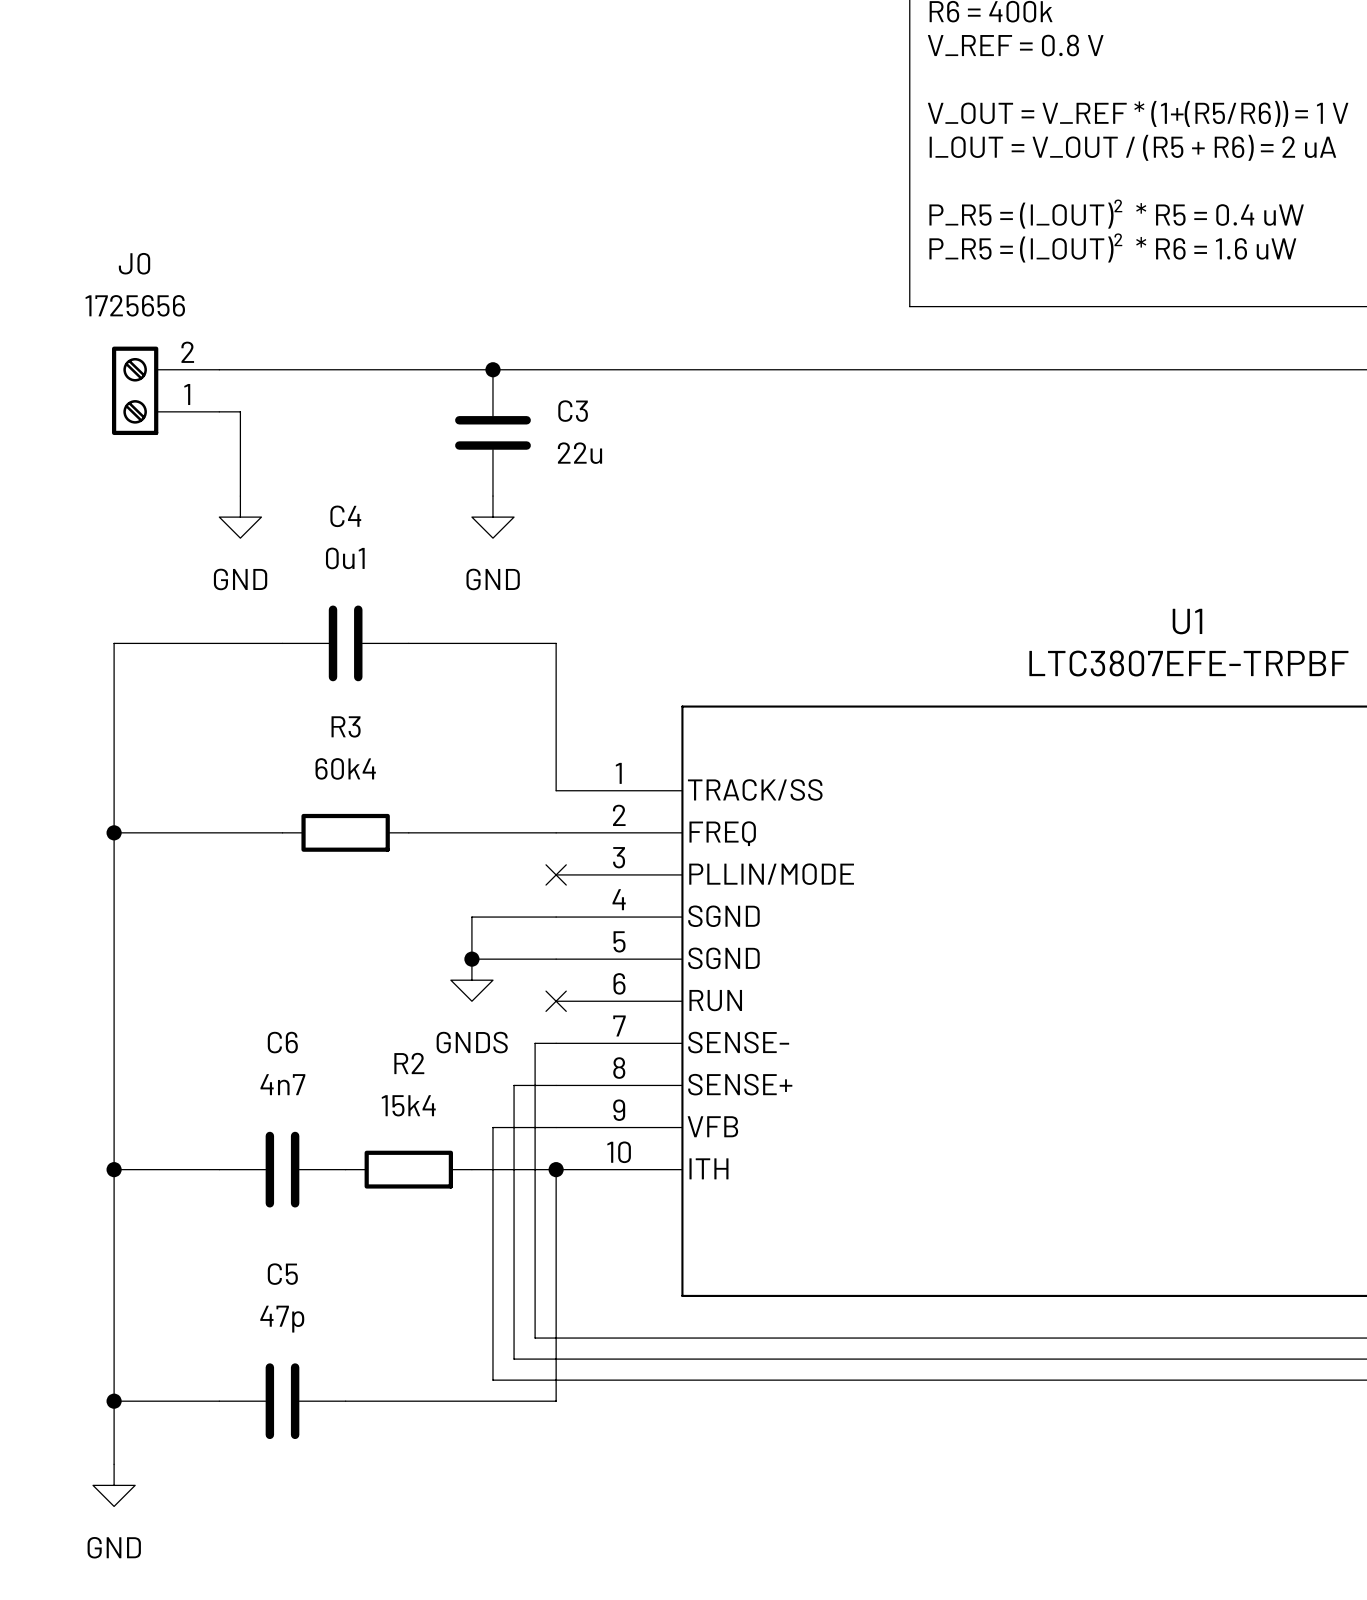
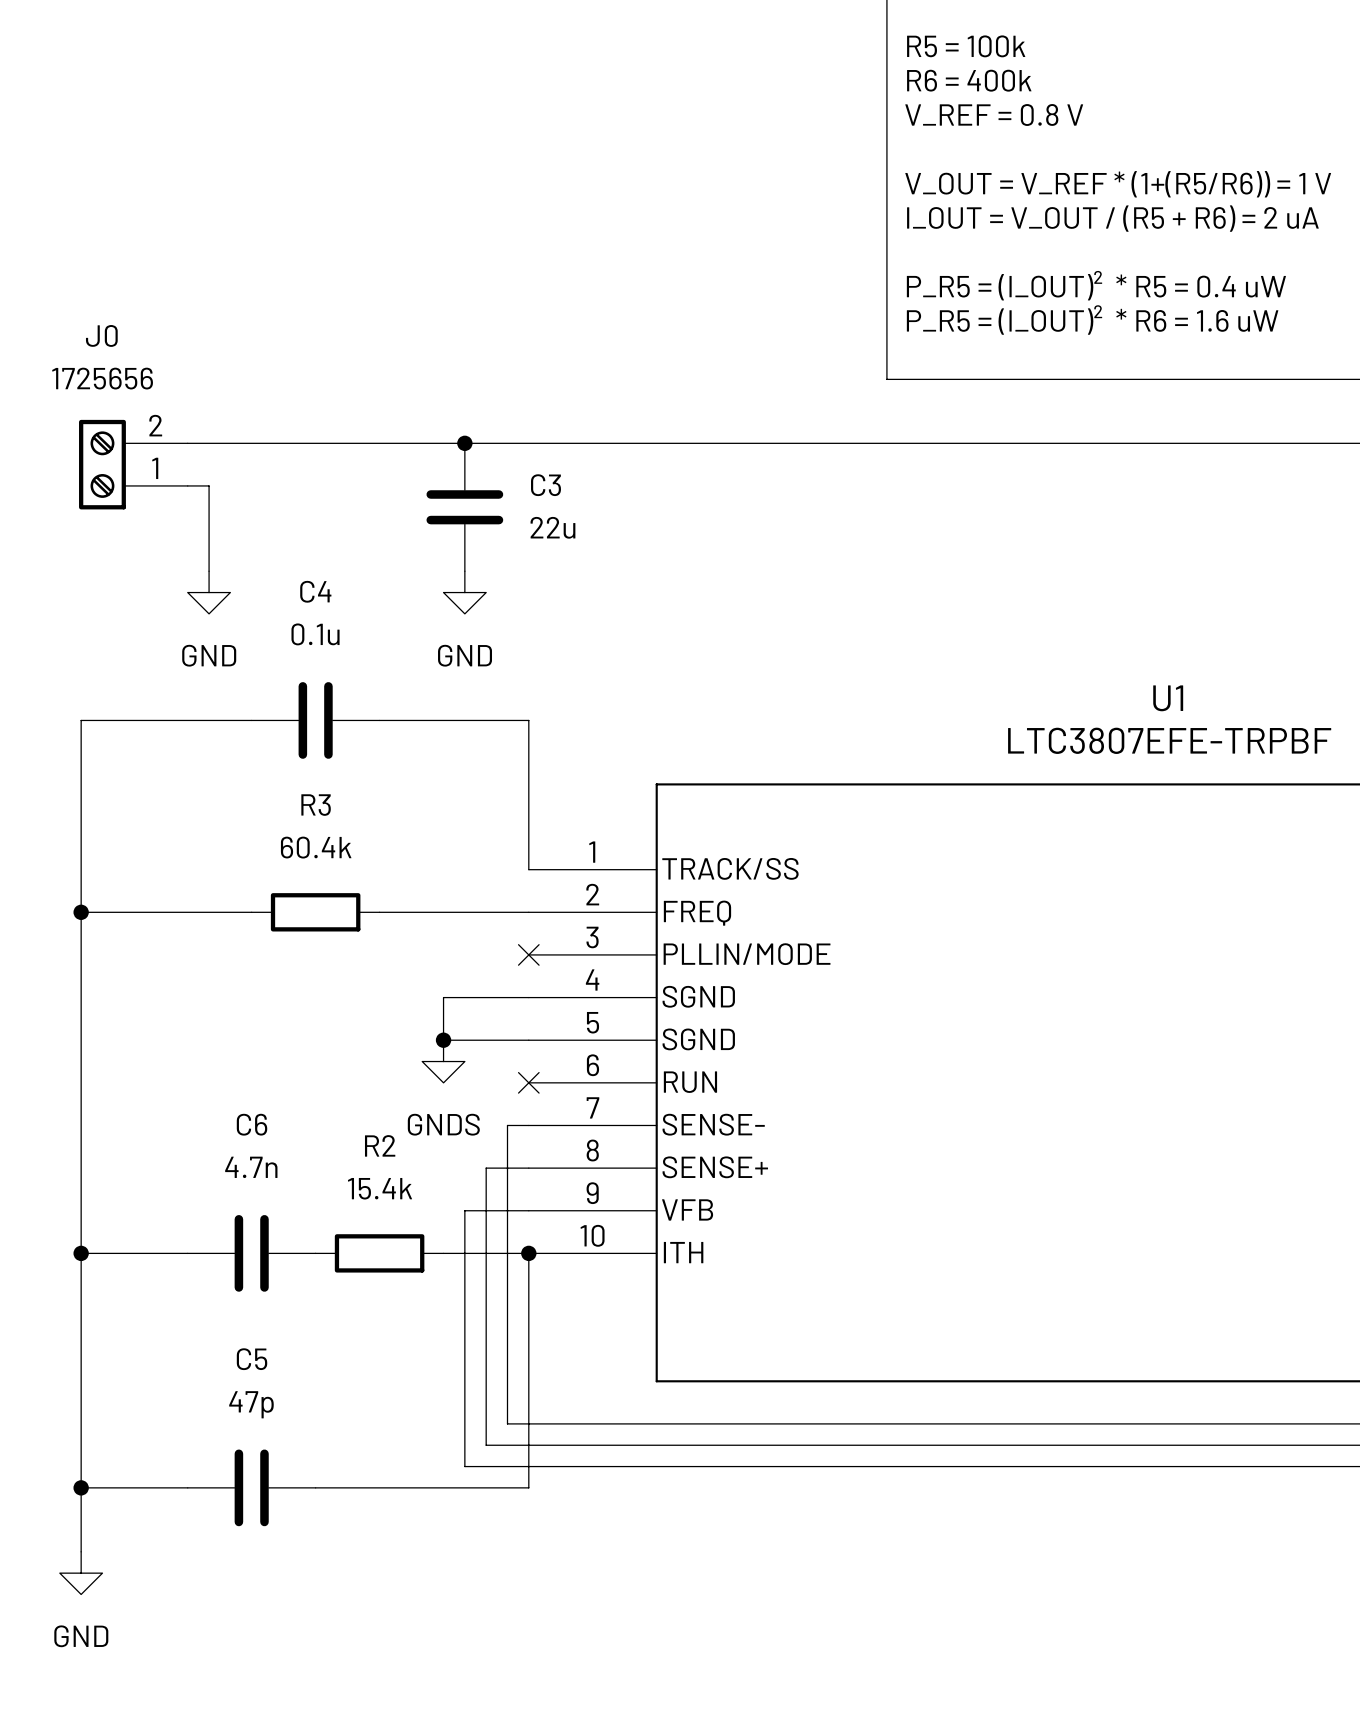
C4 value: 0u1 (345, 558) -> 0.1u (315, 634)
R3 value: 60k4 (345, 768) -> 60.4k (316, 847)
C6 value: 4n7 (282, 1084) -> 4.7n (251, 1167)
R2 value: 15k4 (408, 1105) -> 15.4k (380, 1188)

